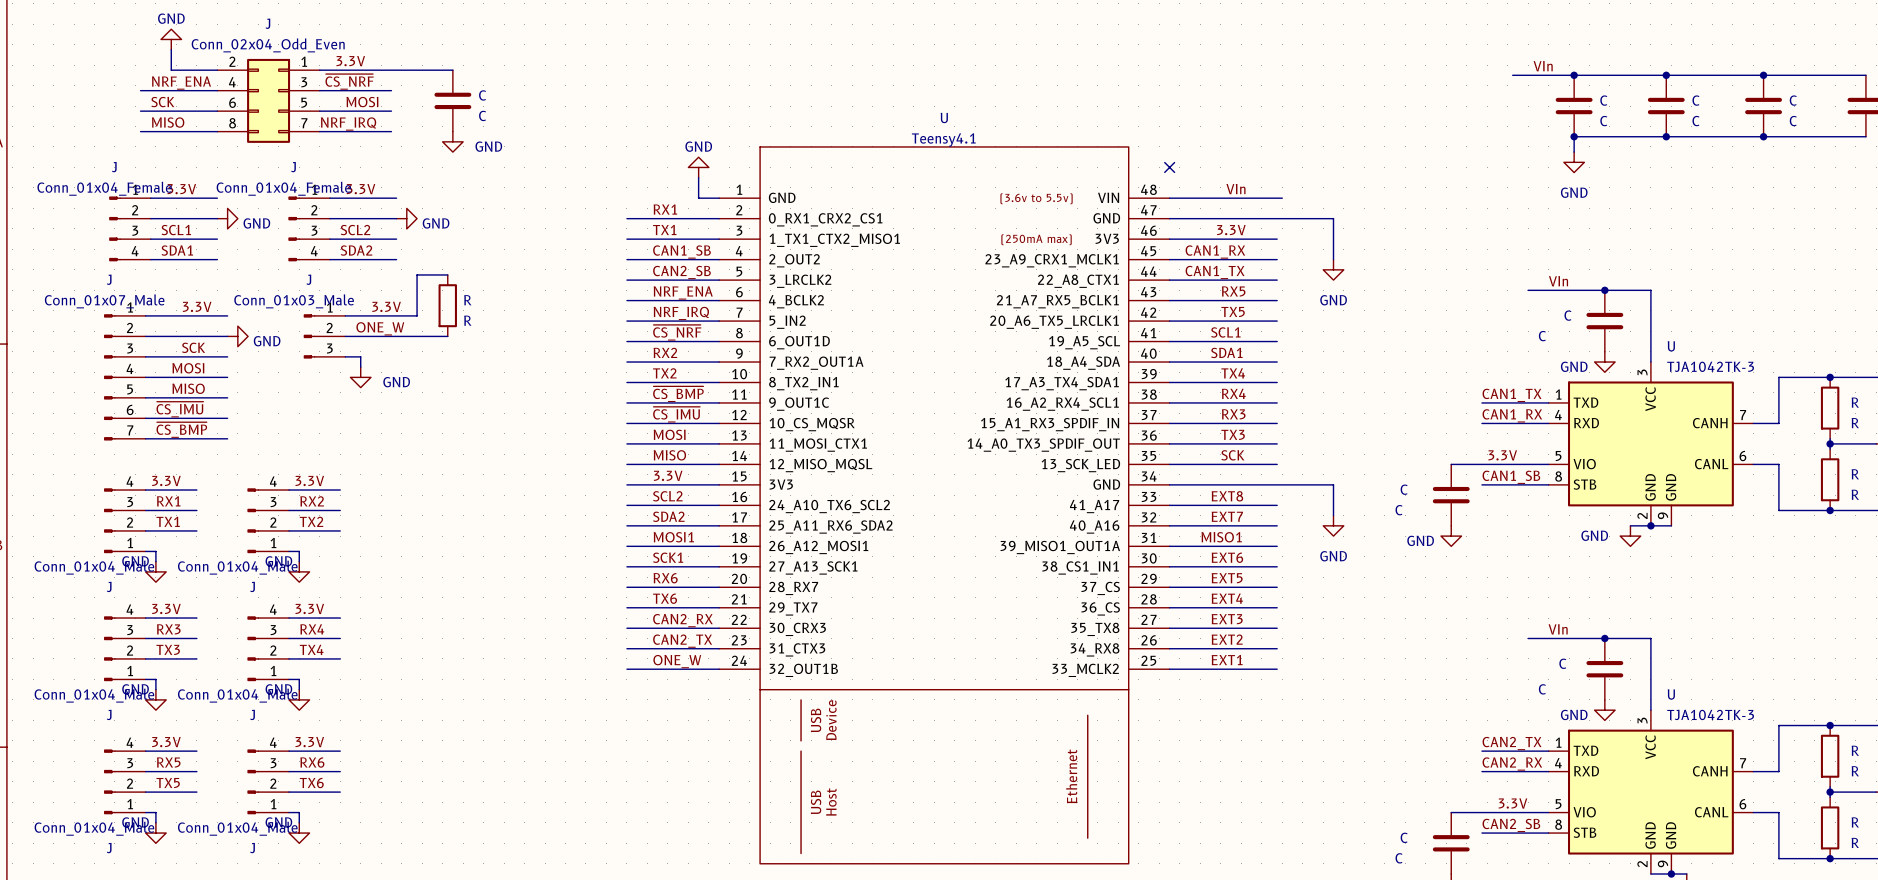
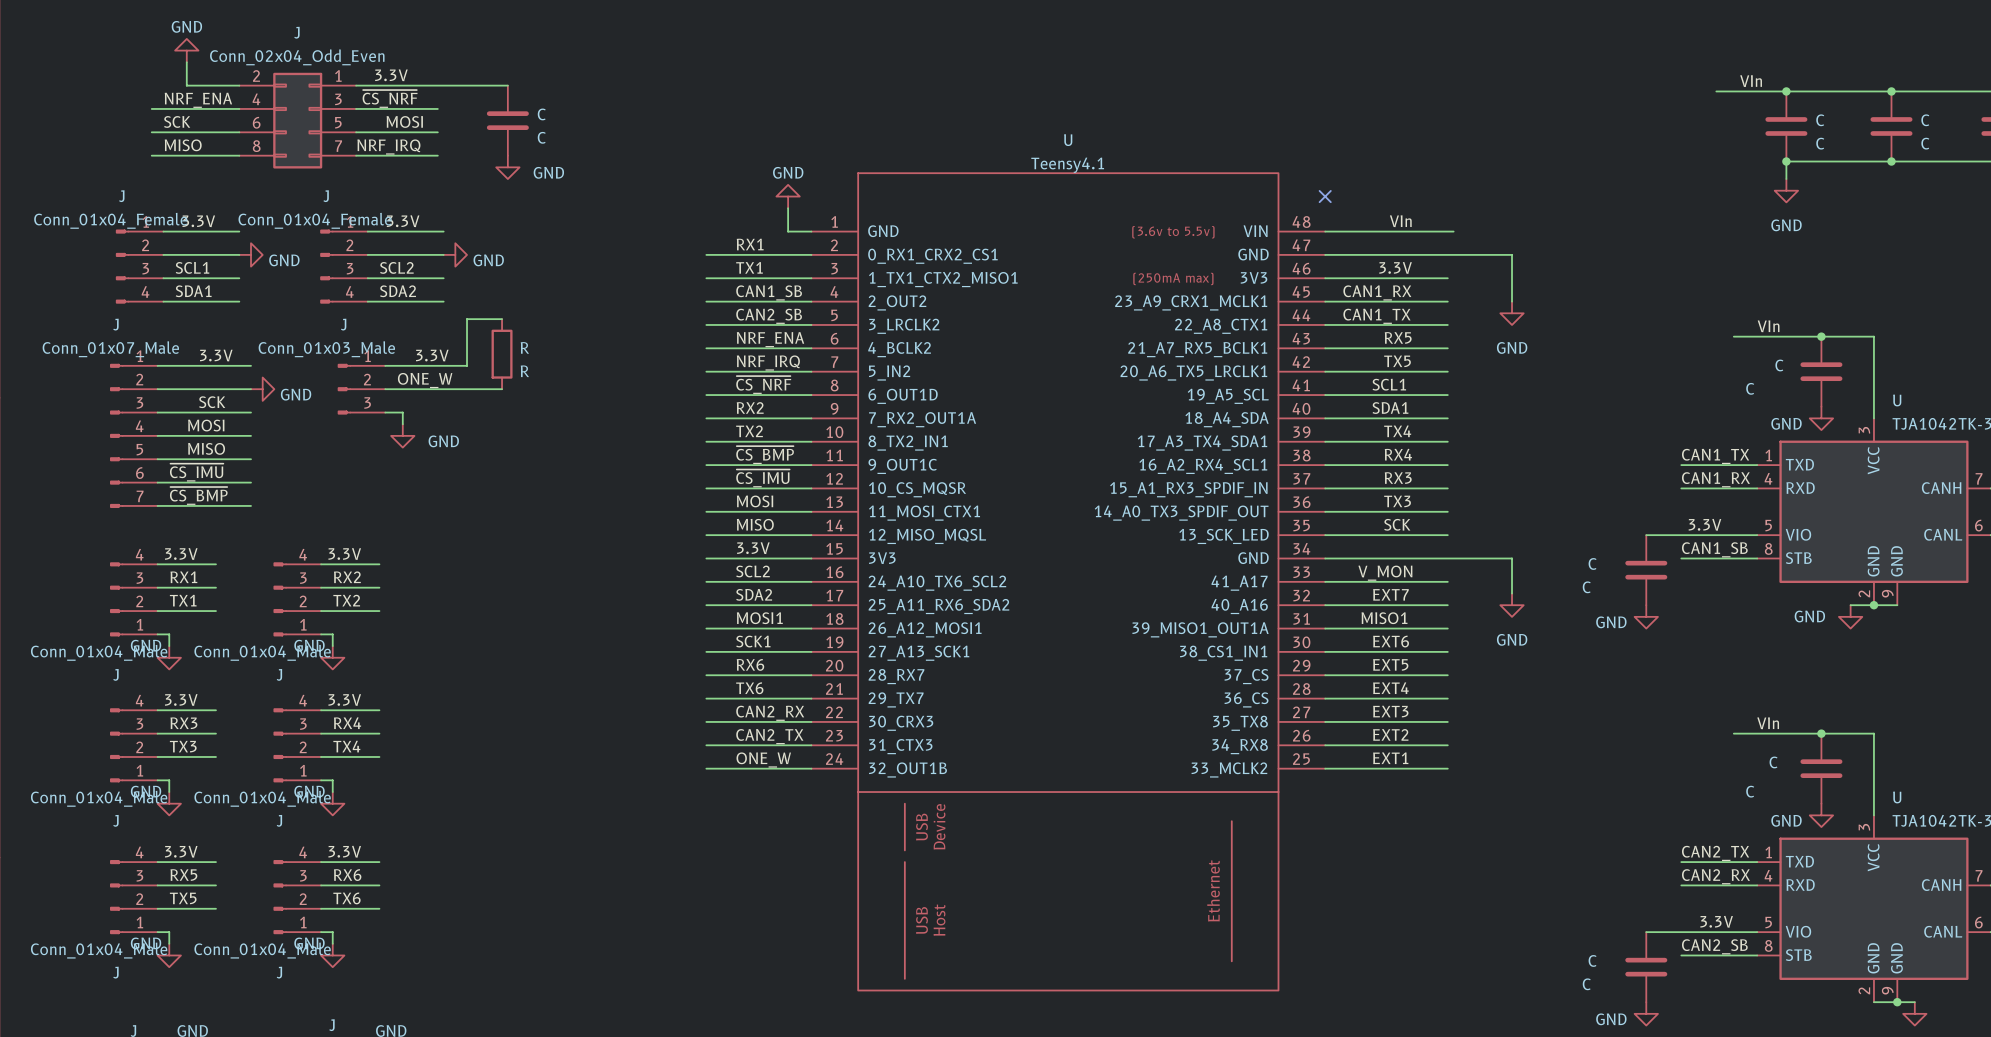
label: EXT8 (1227, 496) -> none
label: none -> V_MON (1385, 573)

